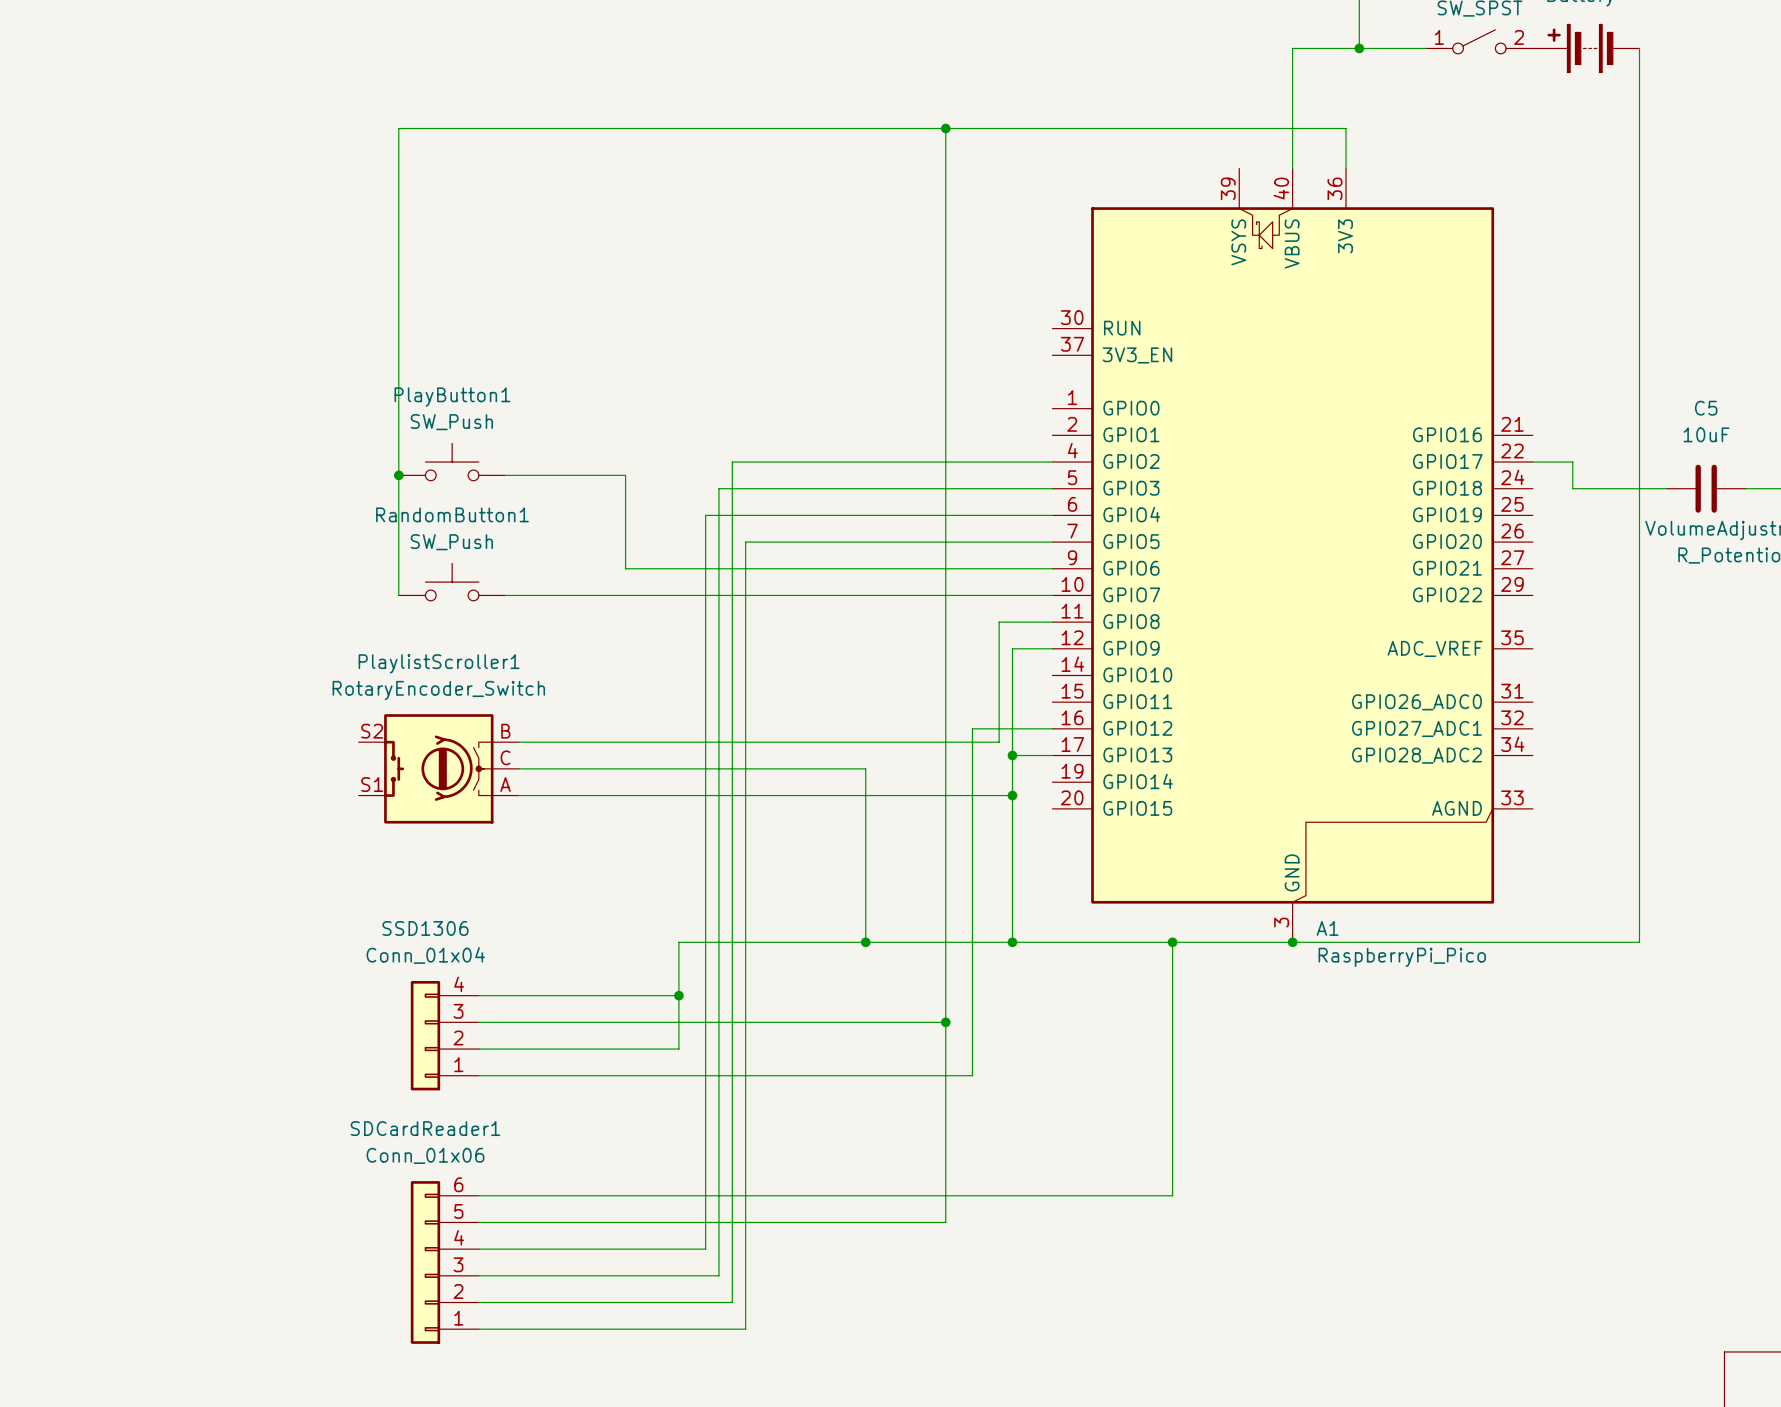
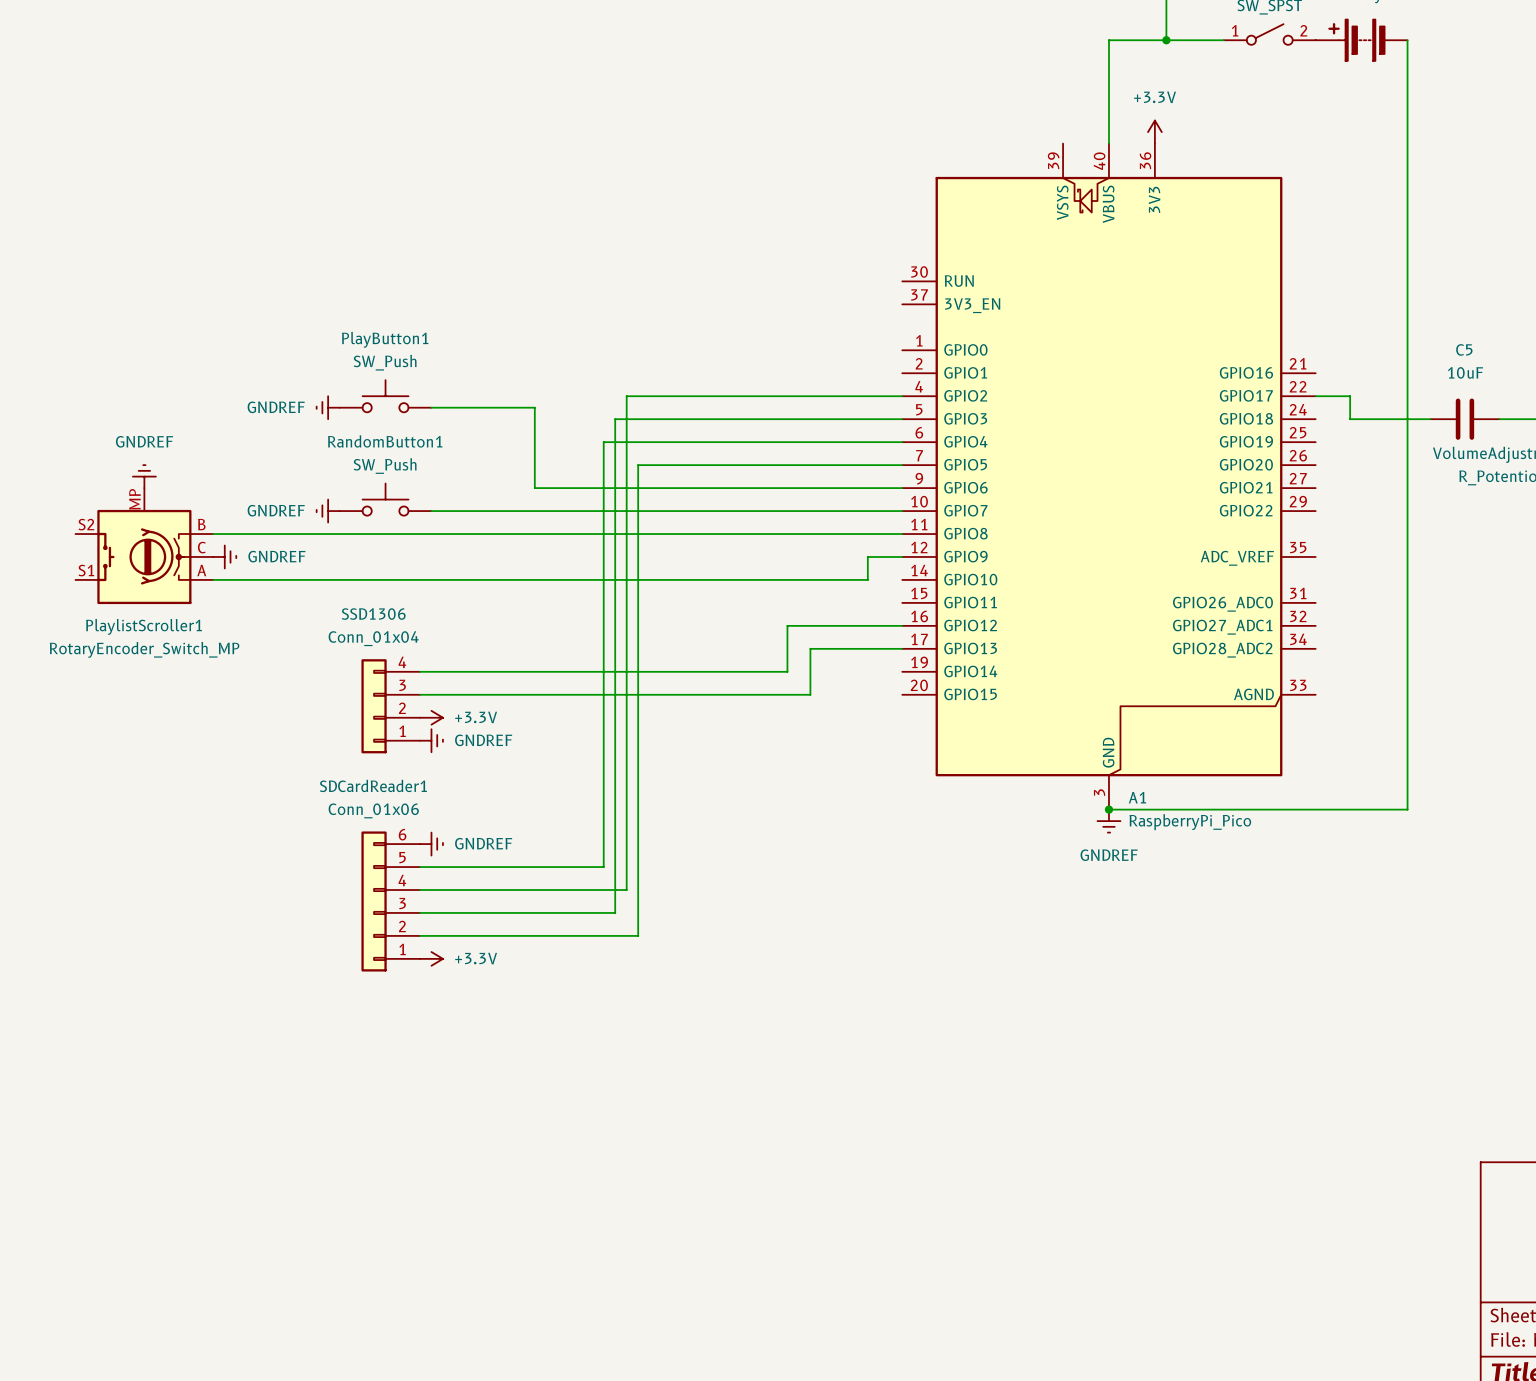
wire: (945, 128) (945, 755) -> (867, 648) (810, 648)
junction: (945, 128) -> none
power symbol: none -> +3.3V (1154, 132)
wire: (1345, 168) (1345, 128) (398, 128) (398, 595) -> none
power symbol: none -> GNDREF (328, 407)
junction: (398, 475) -> none
power symbol: none -> GNDREF (144, 476)
power symbol: none -> GNDREF (328, 511)
wire: (999, 622) (999, 742) (518, 742) -> (856, 534) (213, 534)
power symbol: none -> GNDREF (224, 556)
PlaylistScroller1 name position: PlaylistScroller1 (439, 663) -> PlaylistScroller1 (144, 626)
wire: (1012, 675) (1012, 942) -> (867, 579) (213, 579)
PlaylistScroller1 value: RotaryEncoder_Switch (438, 690) -> RotaryEncoder_Switch_MP (144, 649)
PlaylistScroller1 symbol: [358, 714, 519, 824] -> [75, 488, 214, 605]
wire: (972, 728) (972, 1075) (478, 1075) -> (833, 625) (787, 625) (787, 671) (419, 671)
junction: (1012, 755) -> none
wire: (518, 768) (865, 768) (865, 942) -> none
wire: (518, 795) (1012, 795) -> none
junction: (1012, 795) -> none
wire: (945, 808) (945, 1222) (478, 1222) -> (810, 694) (419, 694)
power symbol: none -> +3.3V (431, 717)
power symbol: none -> GNDREF (431, 740)
junction: (865, 942) -> none
junction: (1012, 942) -> none
wire: (1172, 942) (1172, 1195) (478, 1195) -> none
junction: (1172, 942) -> none
wire: (1292, 942) (678, 942) (678, 1049) (478, 1049) -> none
power symbol: none -> GNDREF (1108, 821)
power symbol: none -> GNDREF (431, 844)
wire: (478, 995) (678, 995) -> none
junction: (678, 995) -> none
wire: (705, 1009) (705, 1249) (478, 1249) -> (603, 867) (419, 867)
wire: (478, 1022) (945, 1022) -> none
junction: (945, 1022) -> none
SSD1306 position: (444, 1035) -> (390, 706)
wire: (732, 1035) (732, 1302) (478, 1302) -> (626, 890) (419, 890)
wire: (718, 1062) (718, 1275) (478, 1275) -> (615, 912) (419, 912)
wire: (745, 1089) (745, 1329) (478, 1329) -> (638, 935) (419, 935)
power symbol: none -> +3.3V (431, 958)
SDCardReader1 position: (444, 1262) -> (390, 901)

